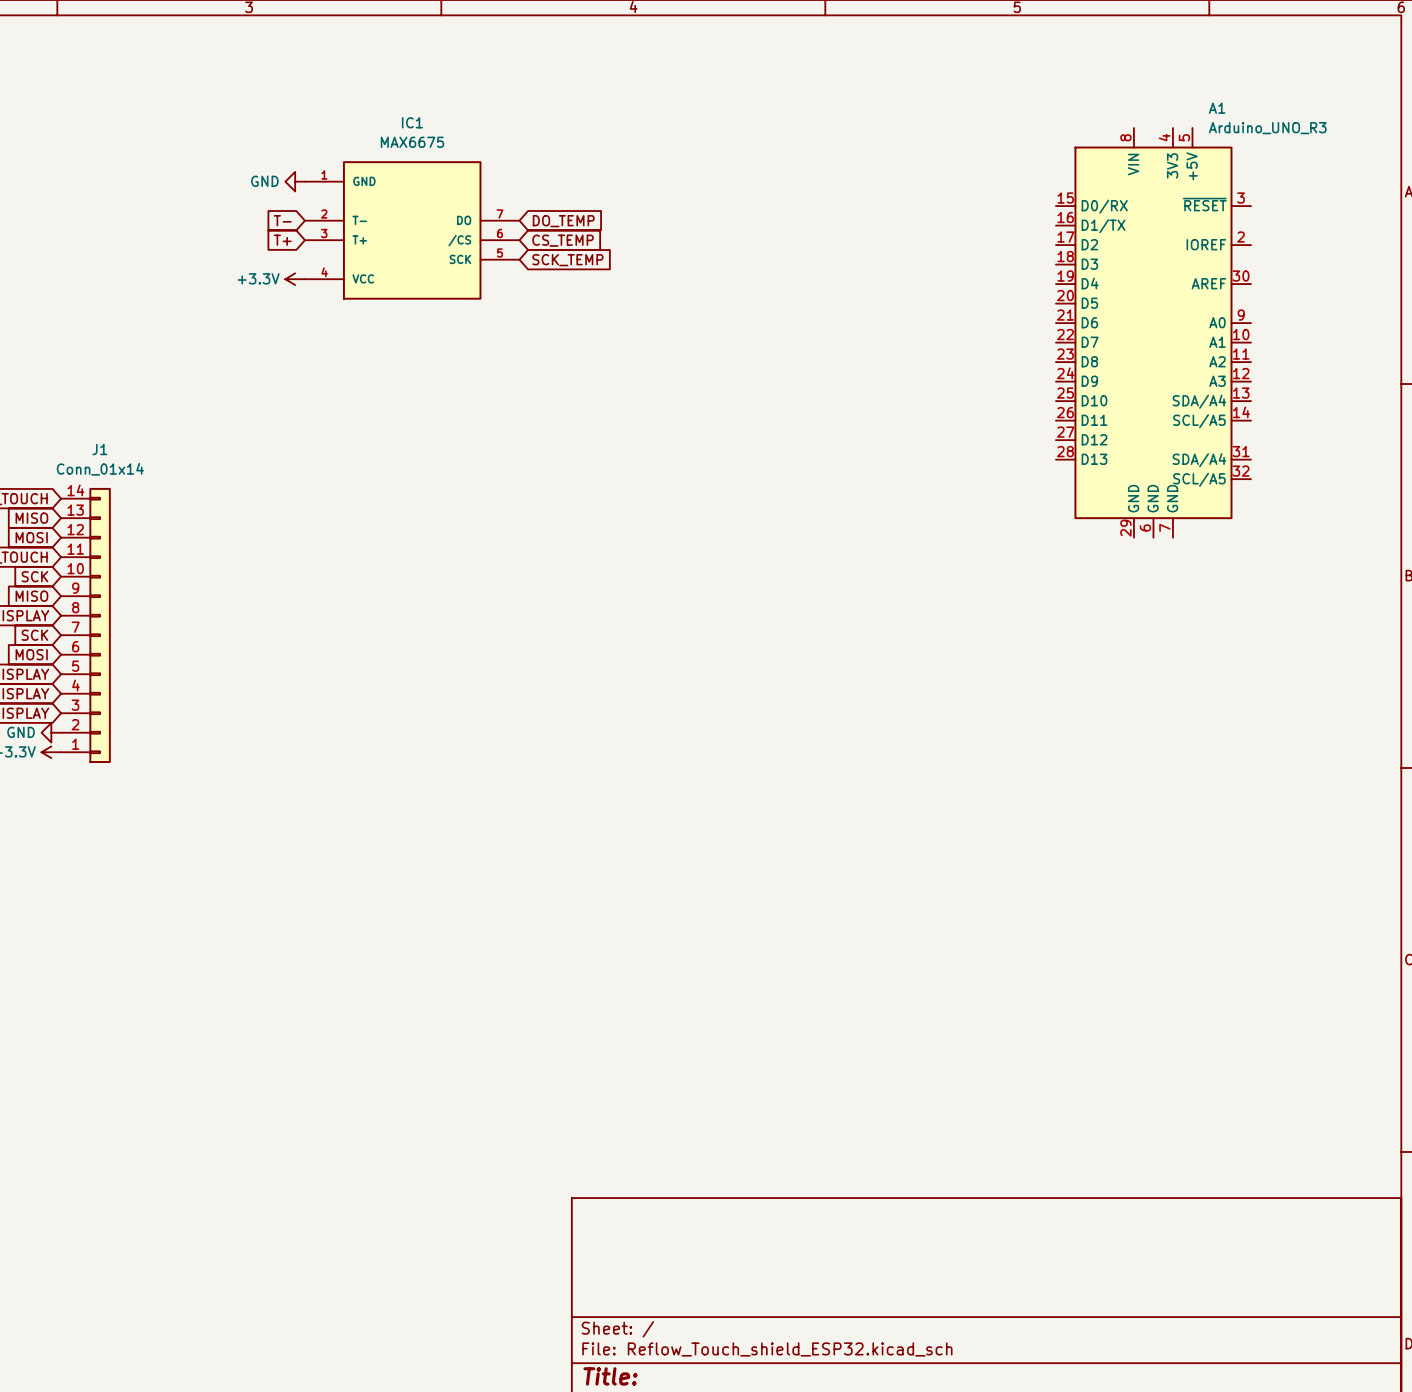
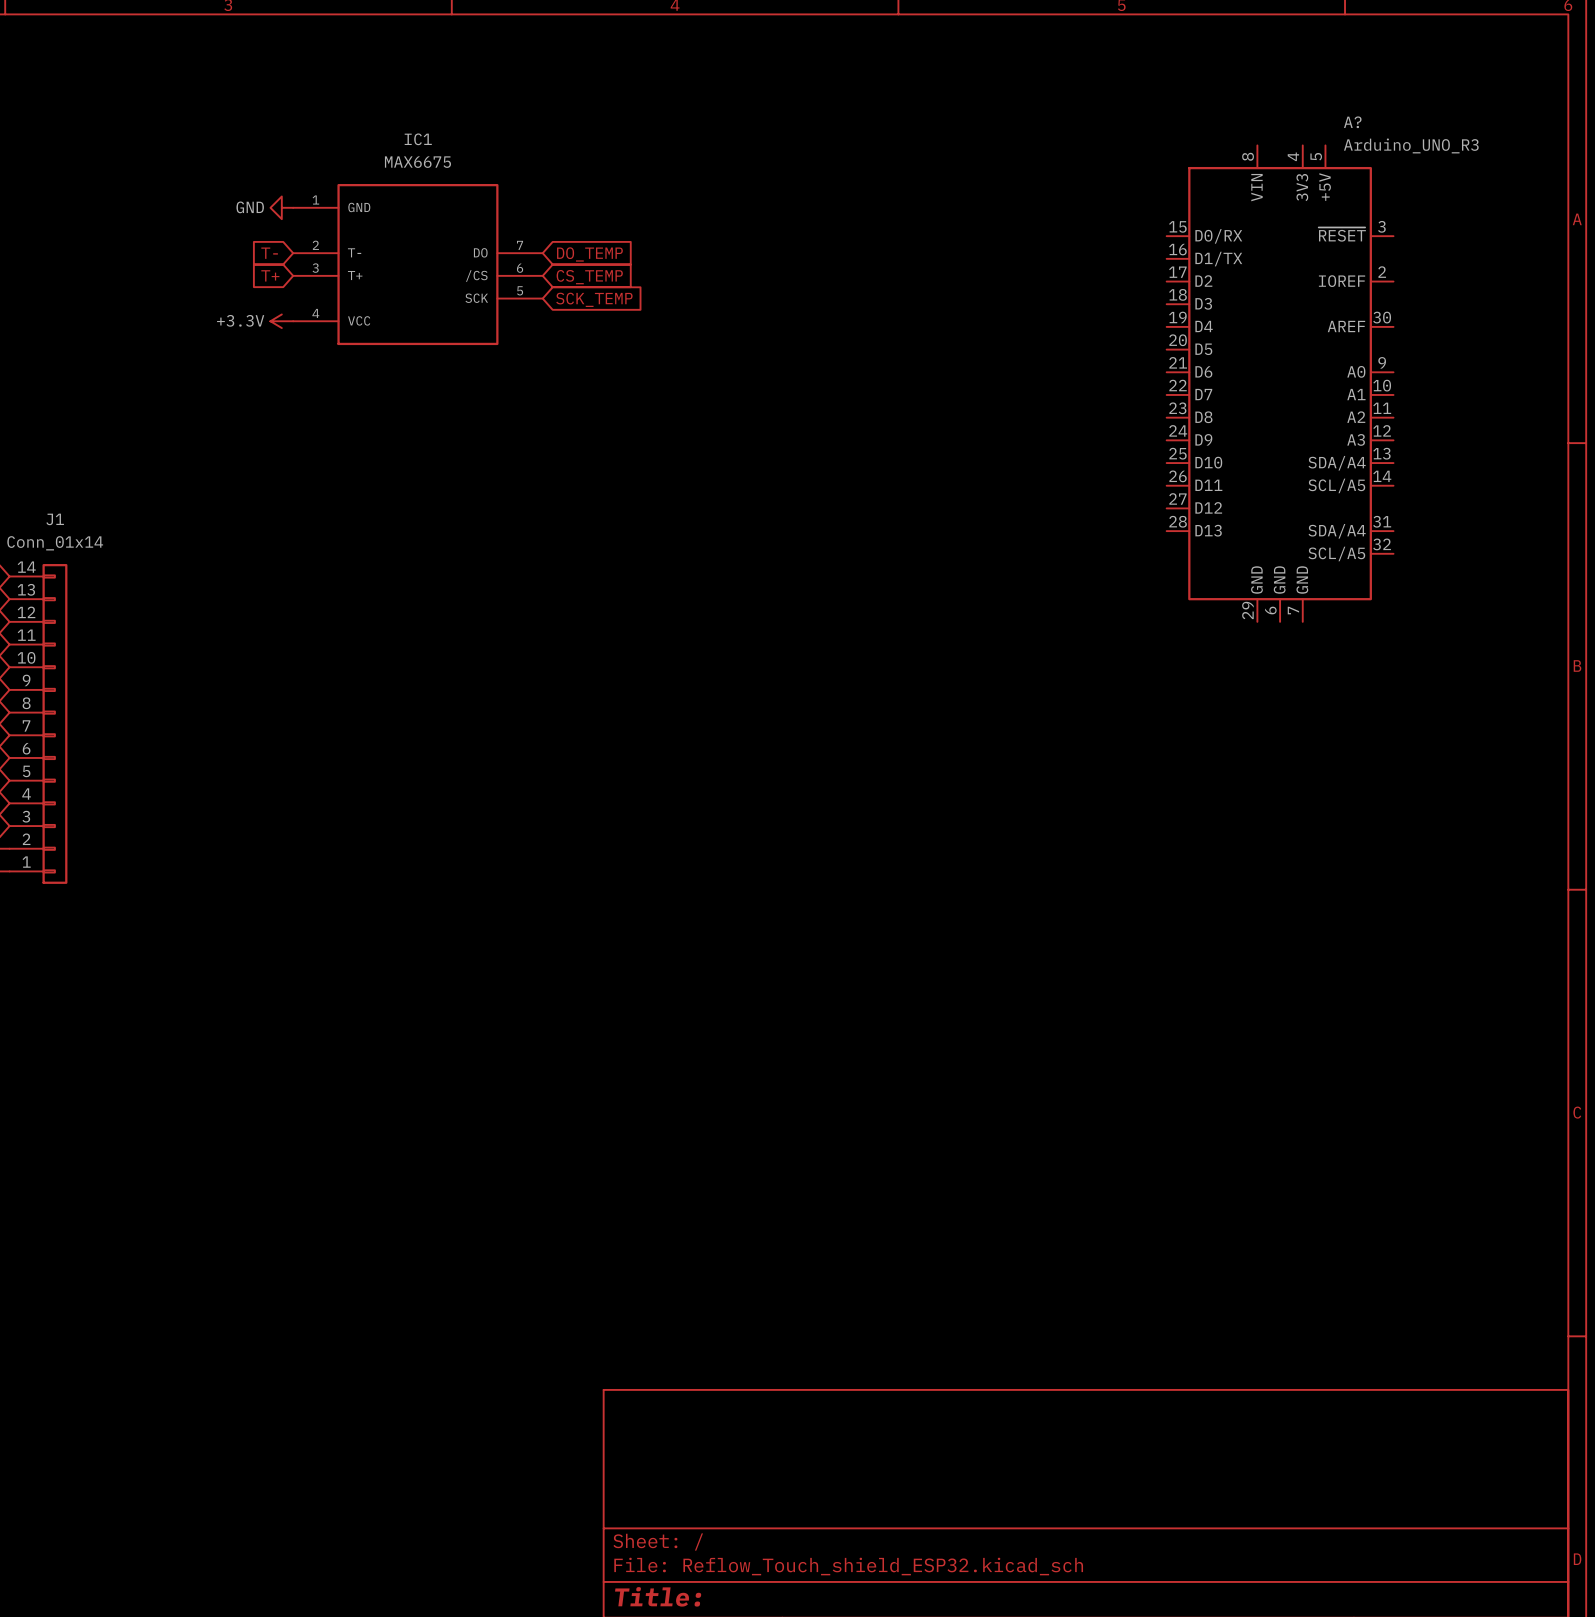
A1 name: A1 (1217, 108) -> A? (1352, 122)

